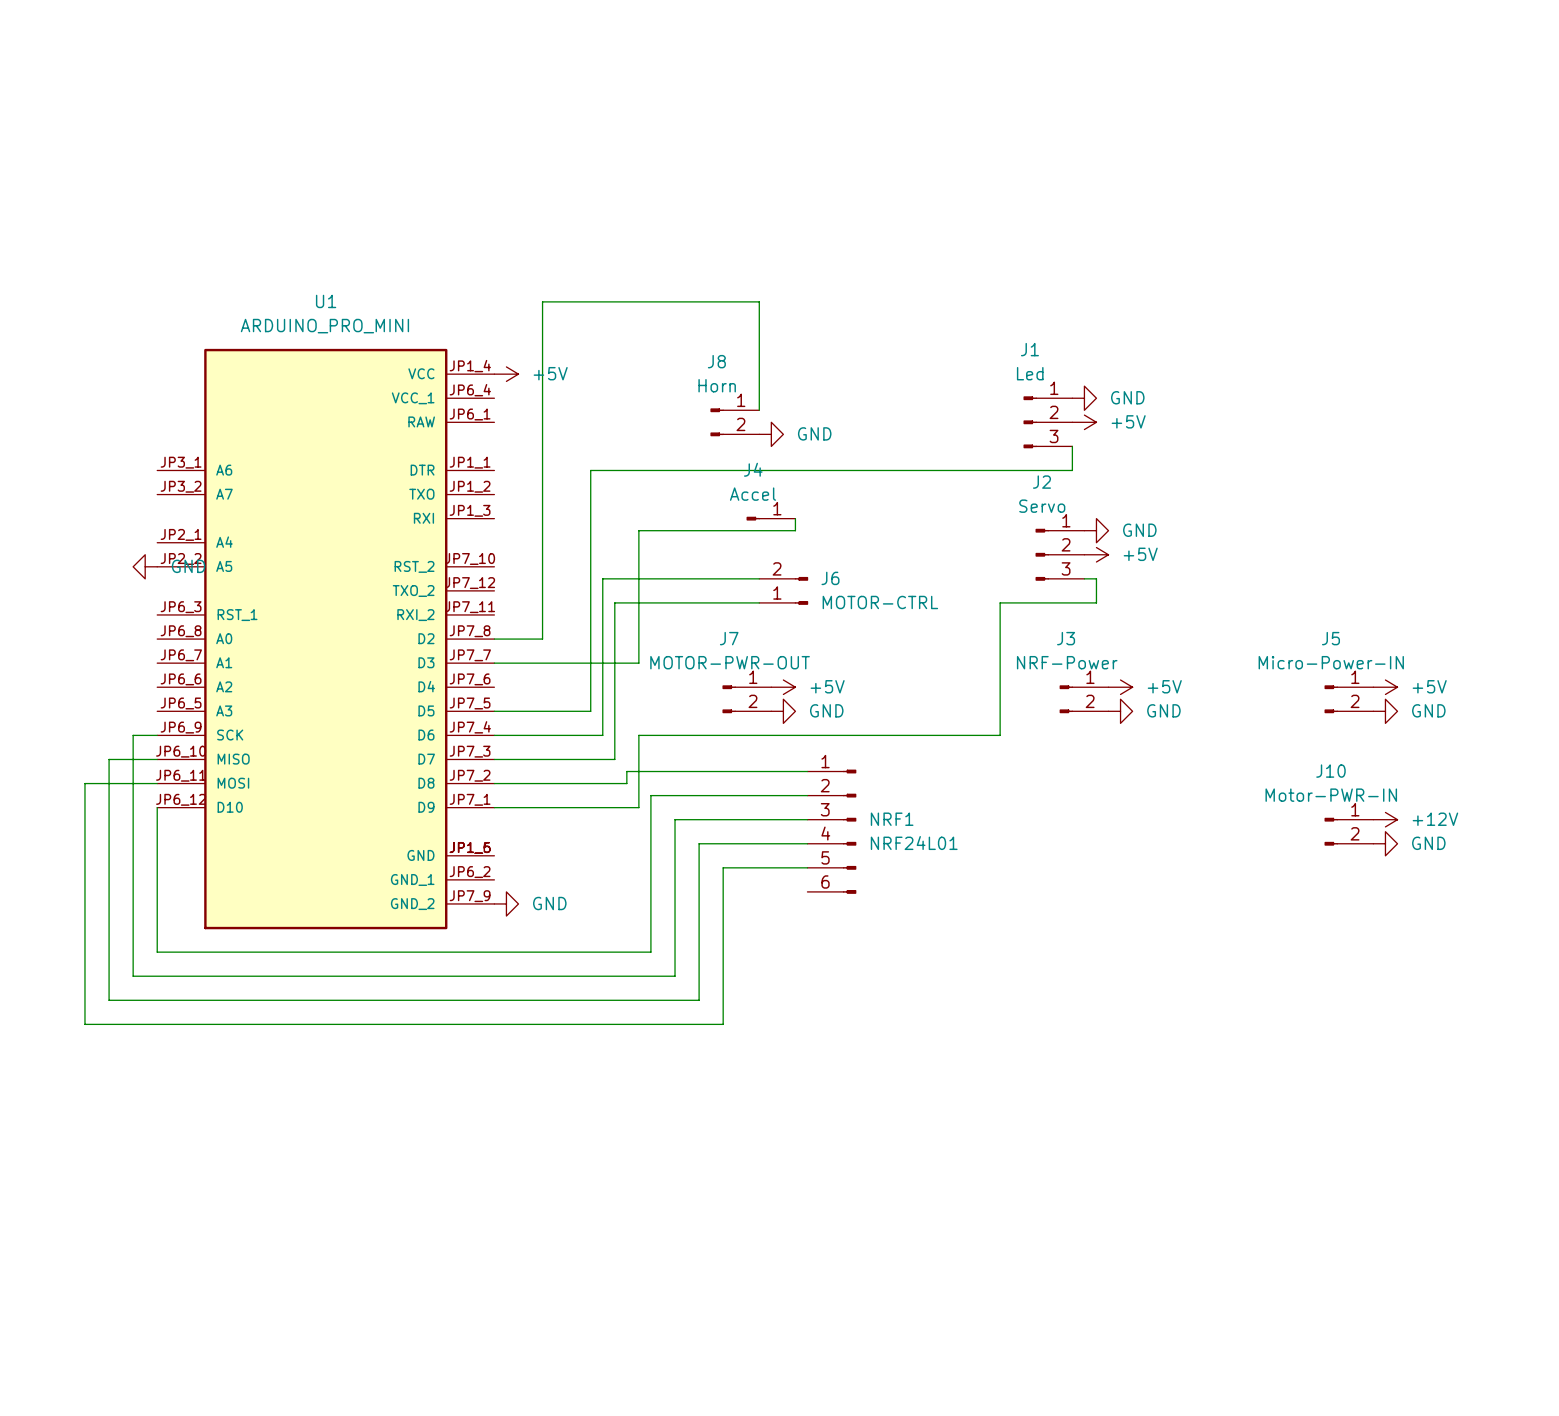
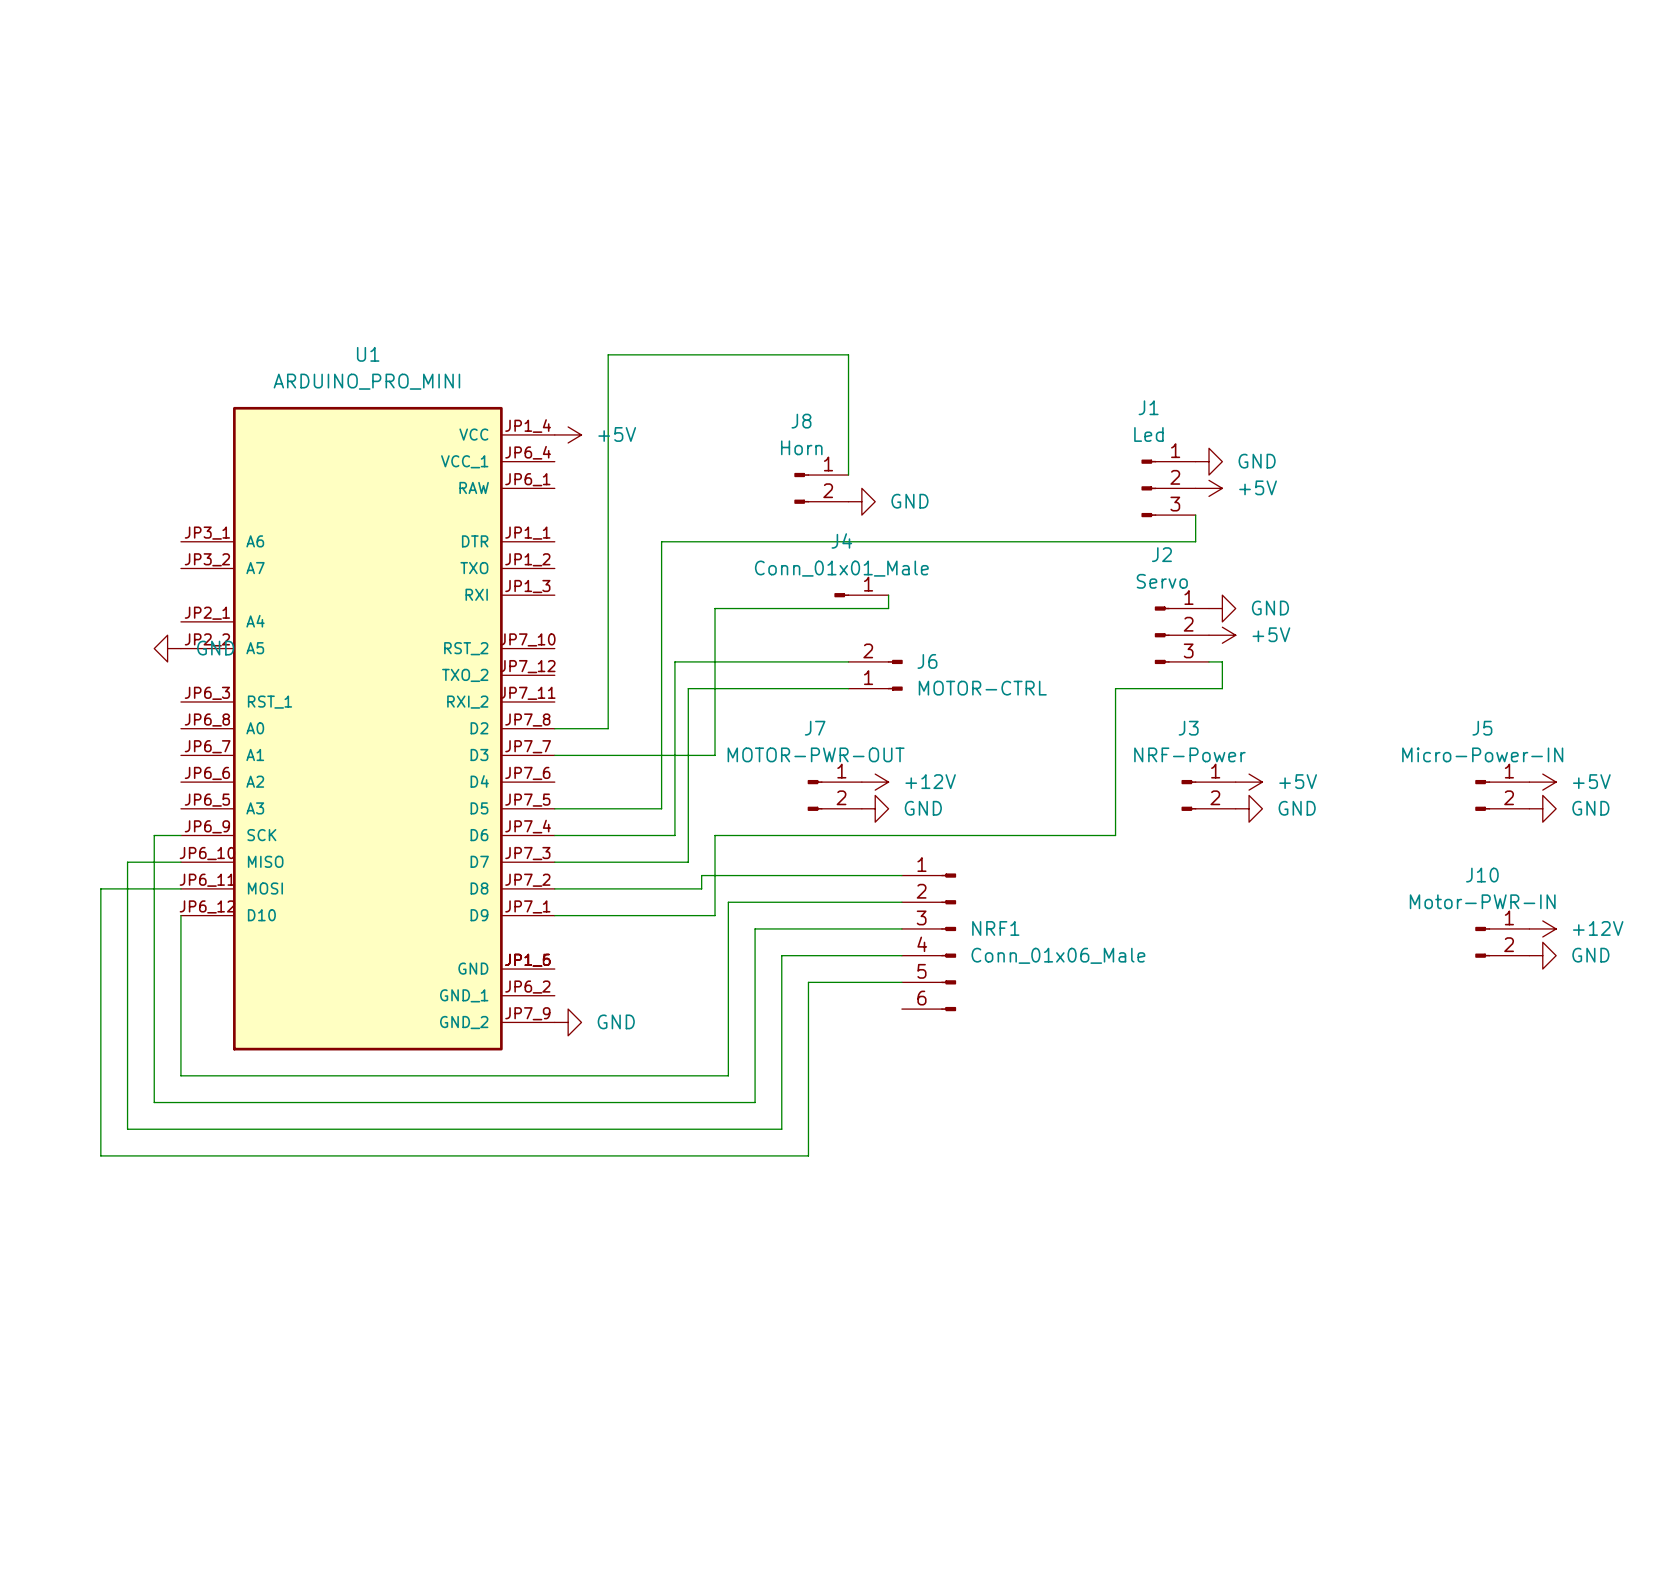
J4 value: Accel (752, 494) -> Conn_01x01_Male (841, 568)
power symbol: +5V (783, 687) -> +12V (875, 782)
NRF1 value: NRF24L01 (914, 843) -> Conn_01x06_Male (1058, 955)

